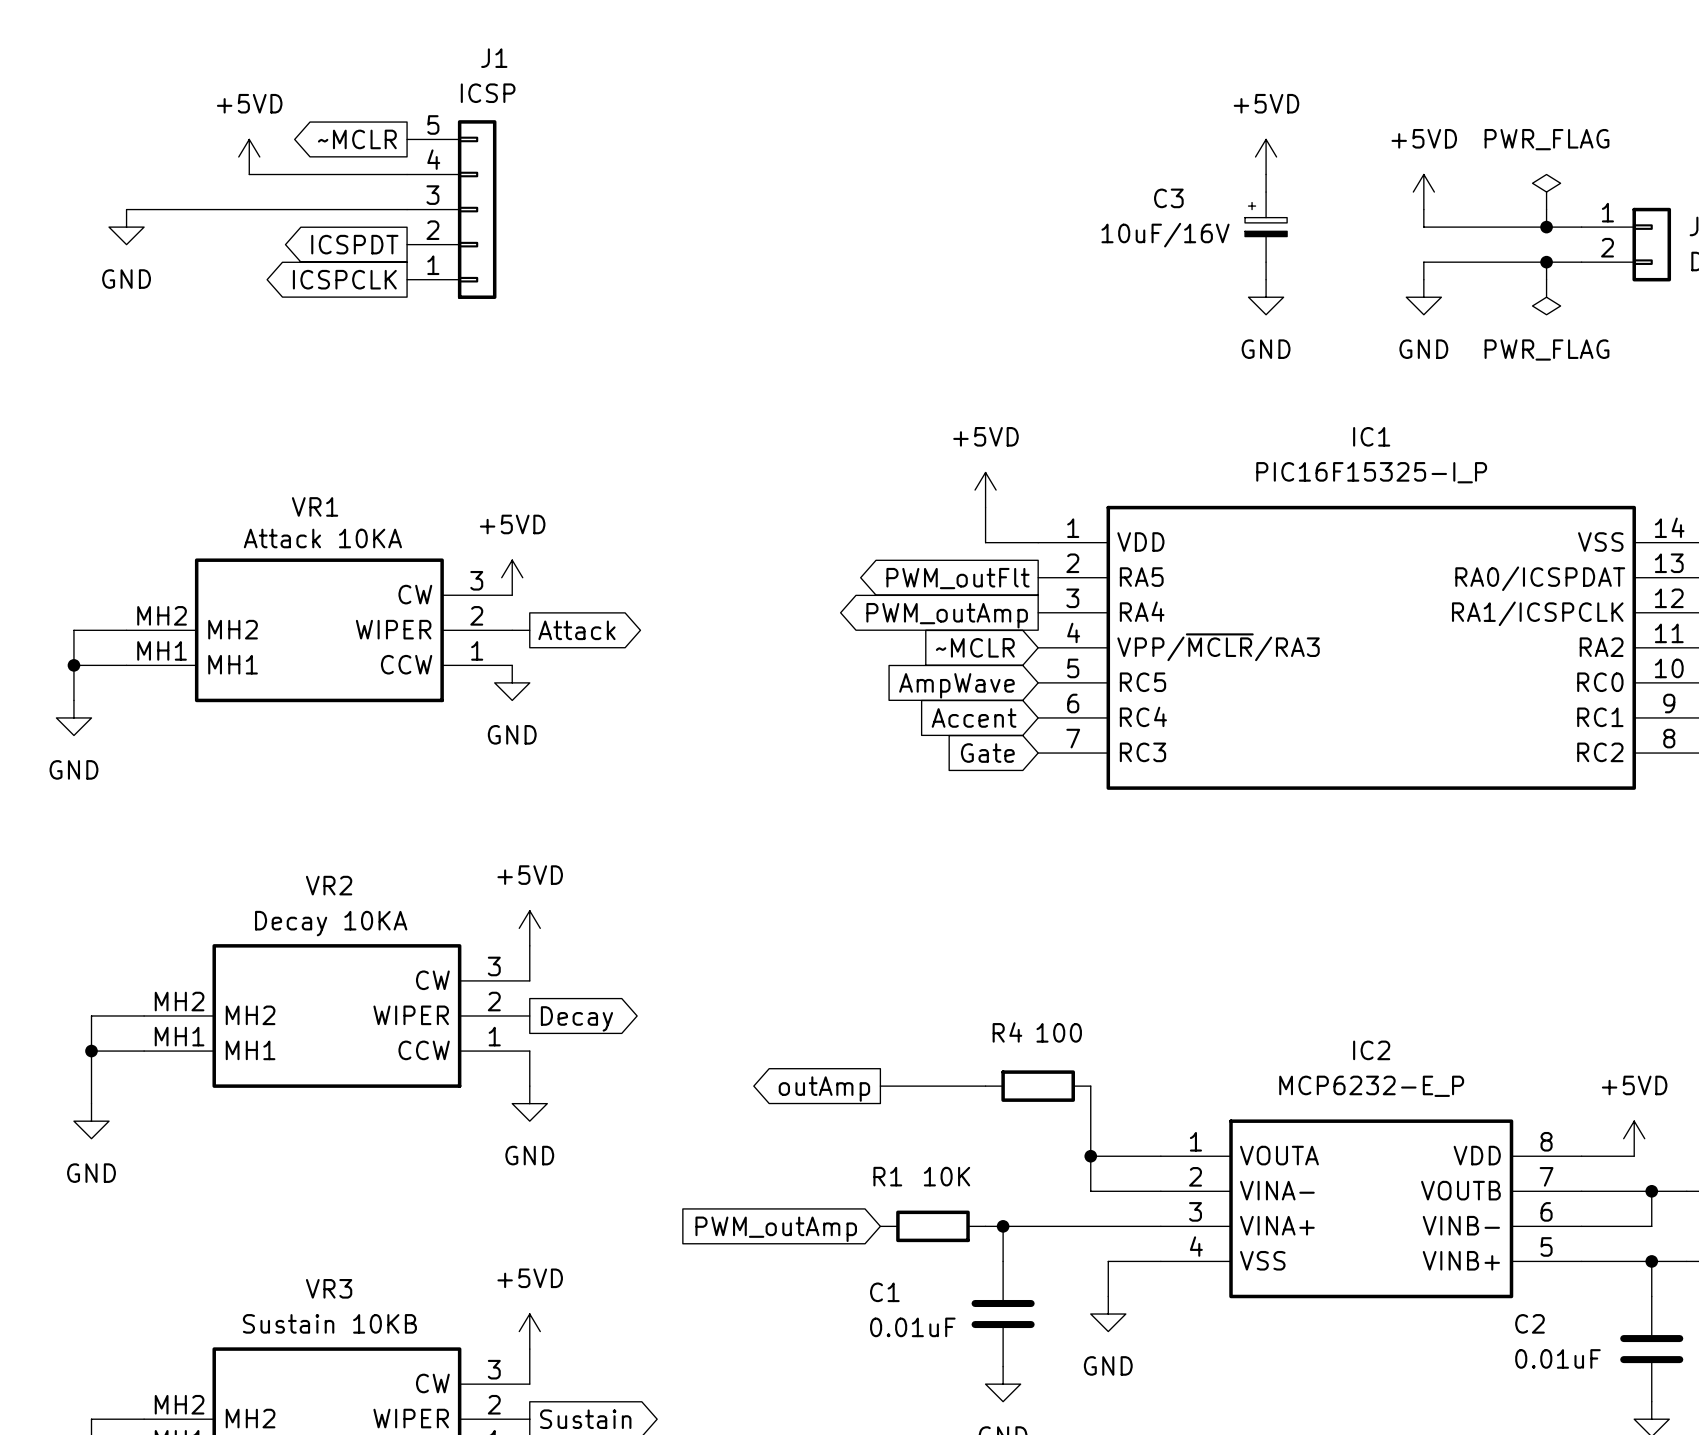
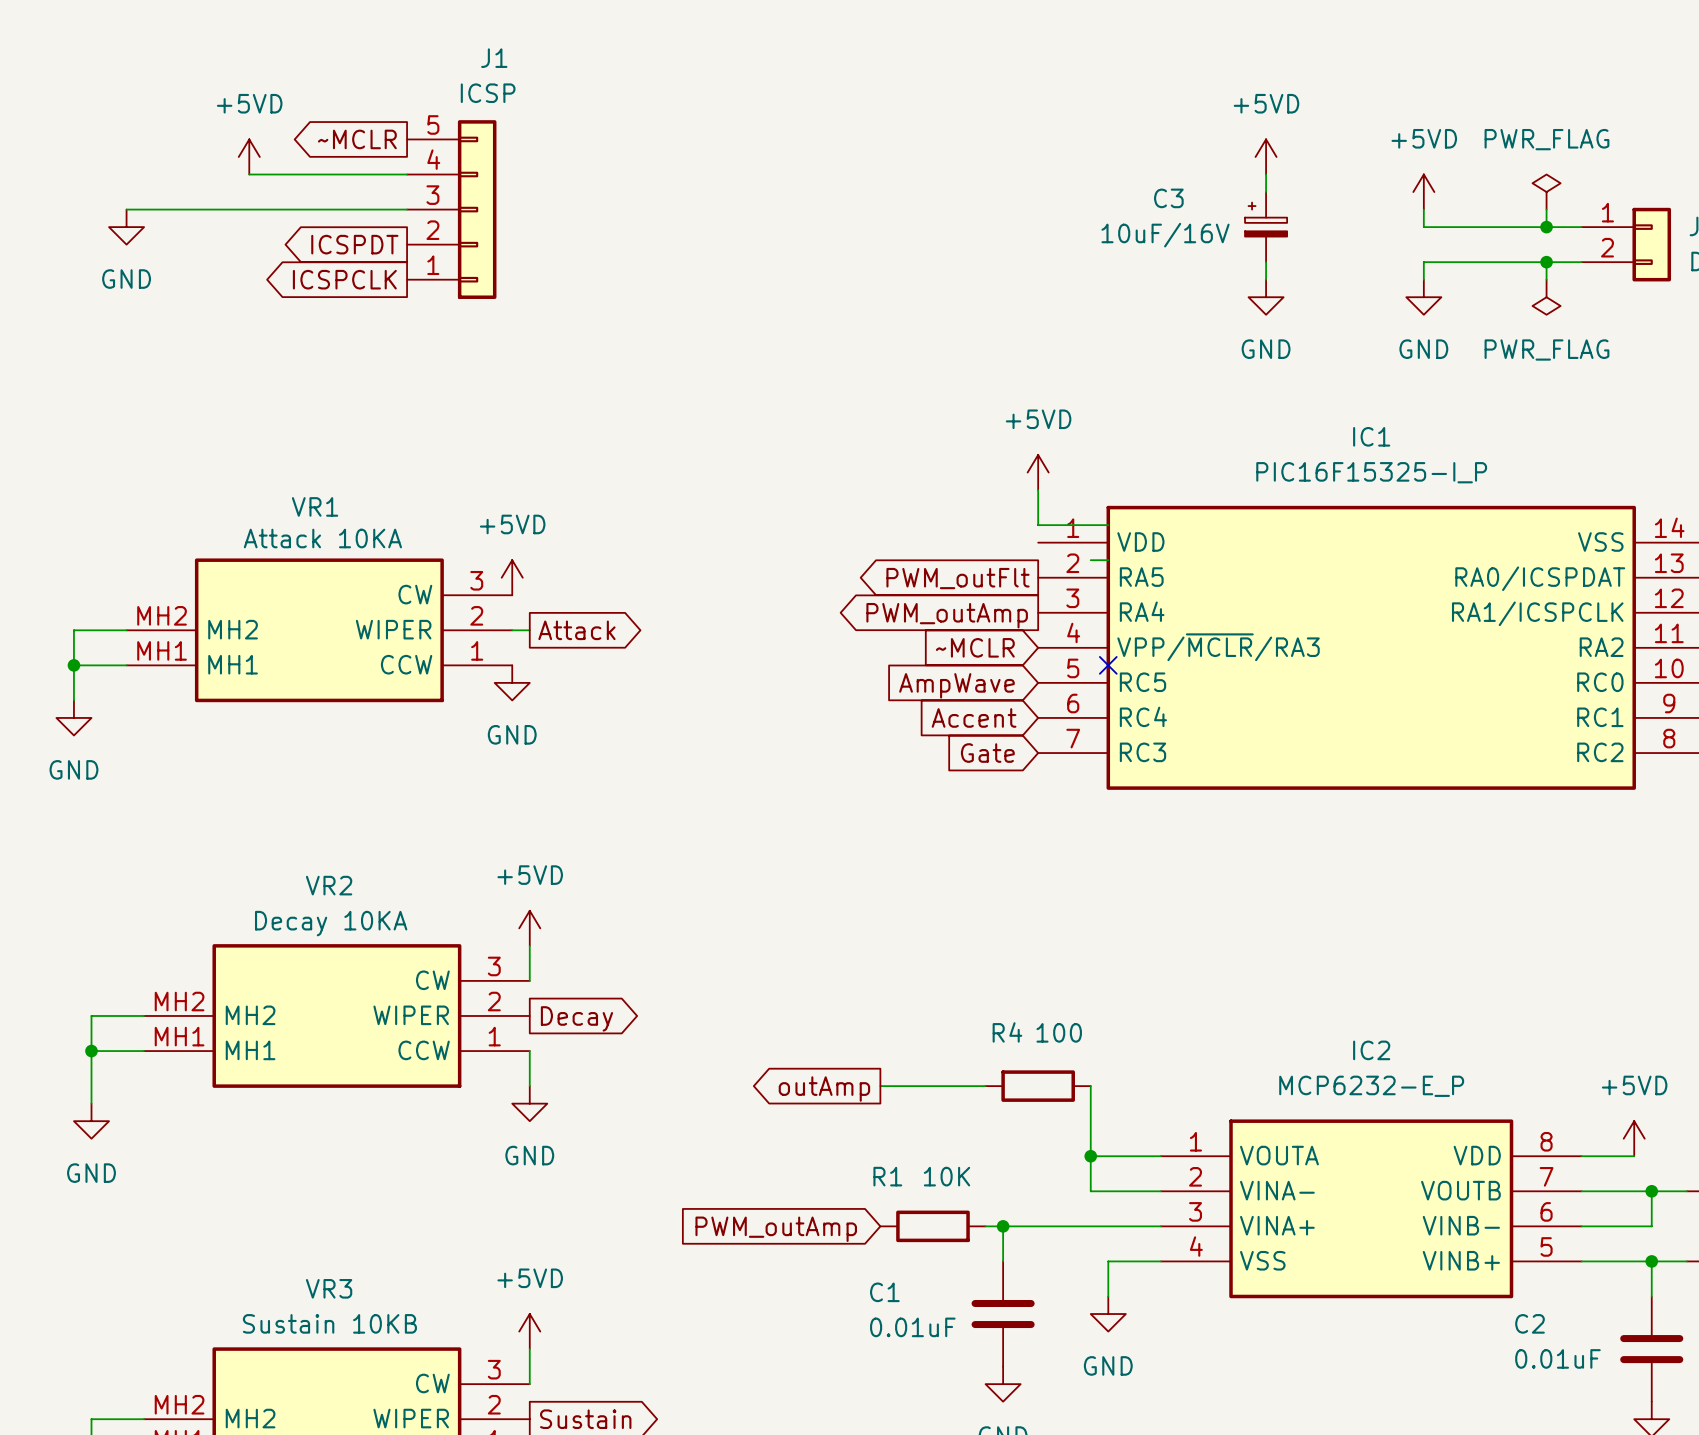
power symbol position: +5VD (985, 490) -> +5VD (1038, 472)
wire: none -> (1038, 490) (1038, 525) (1108, 525)
wire: (985, 507) (985, 542) (1038, 542) -> none
wire: none -> (1090, 560) (1108, 560)
no-connect mark: none -> (1108, 665)

